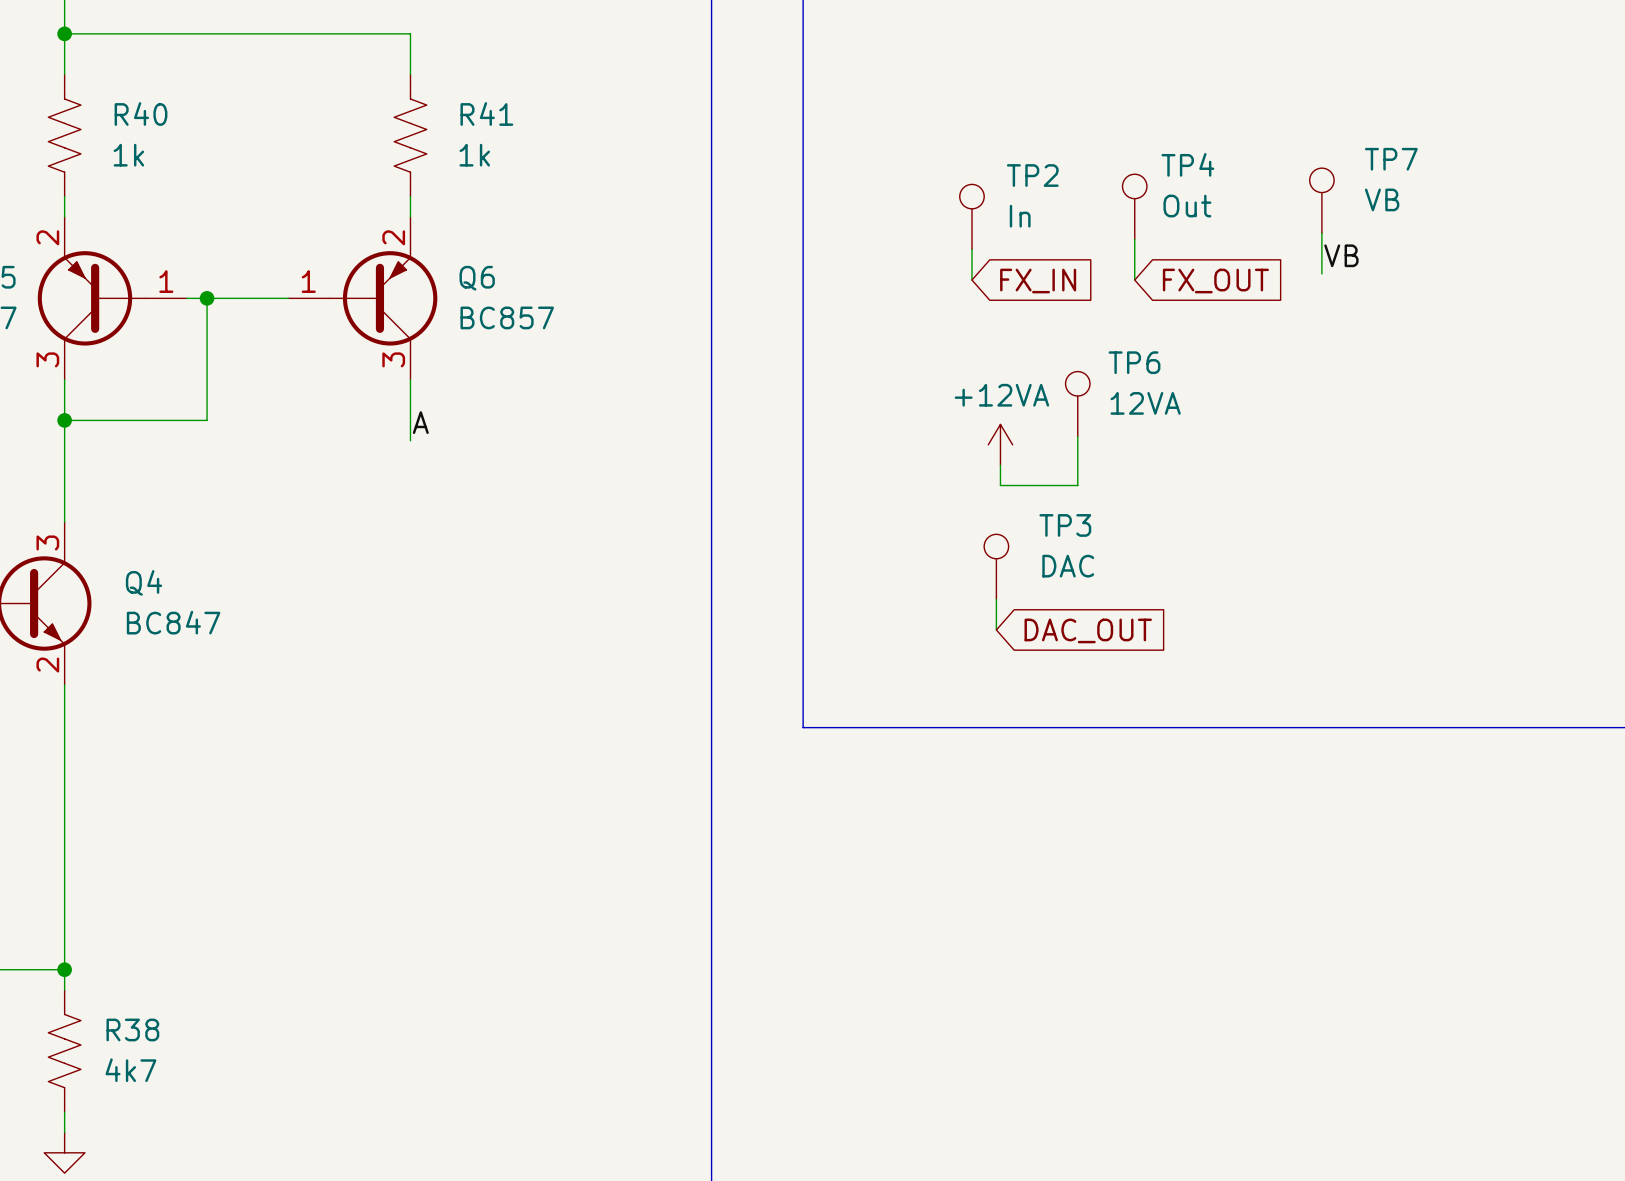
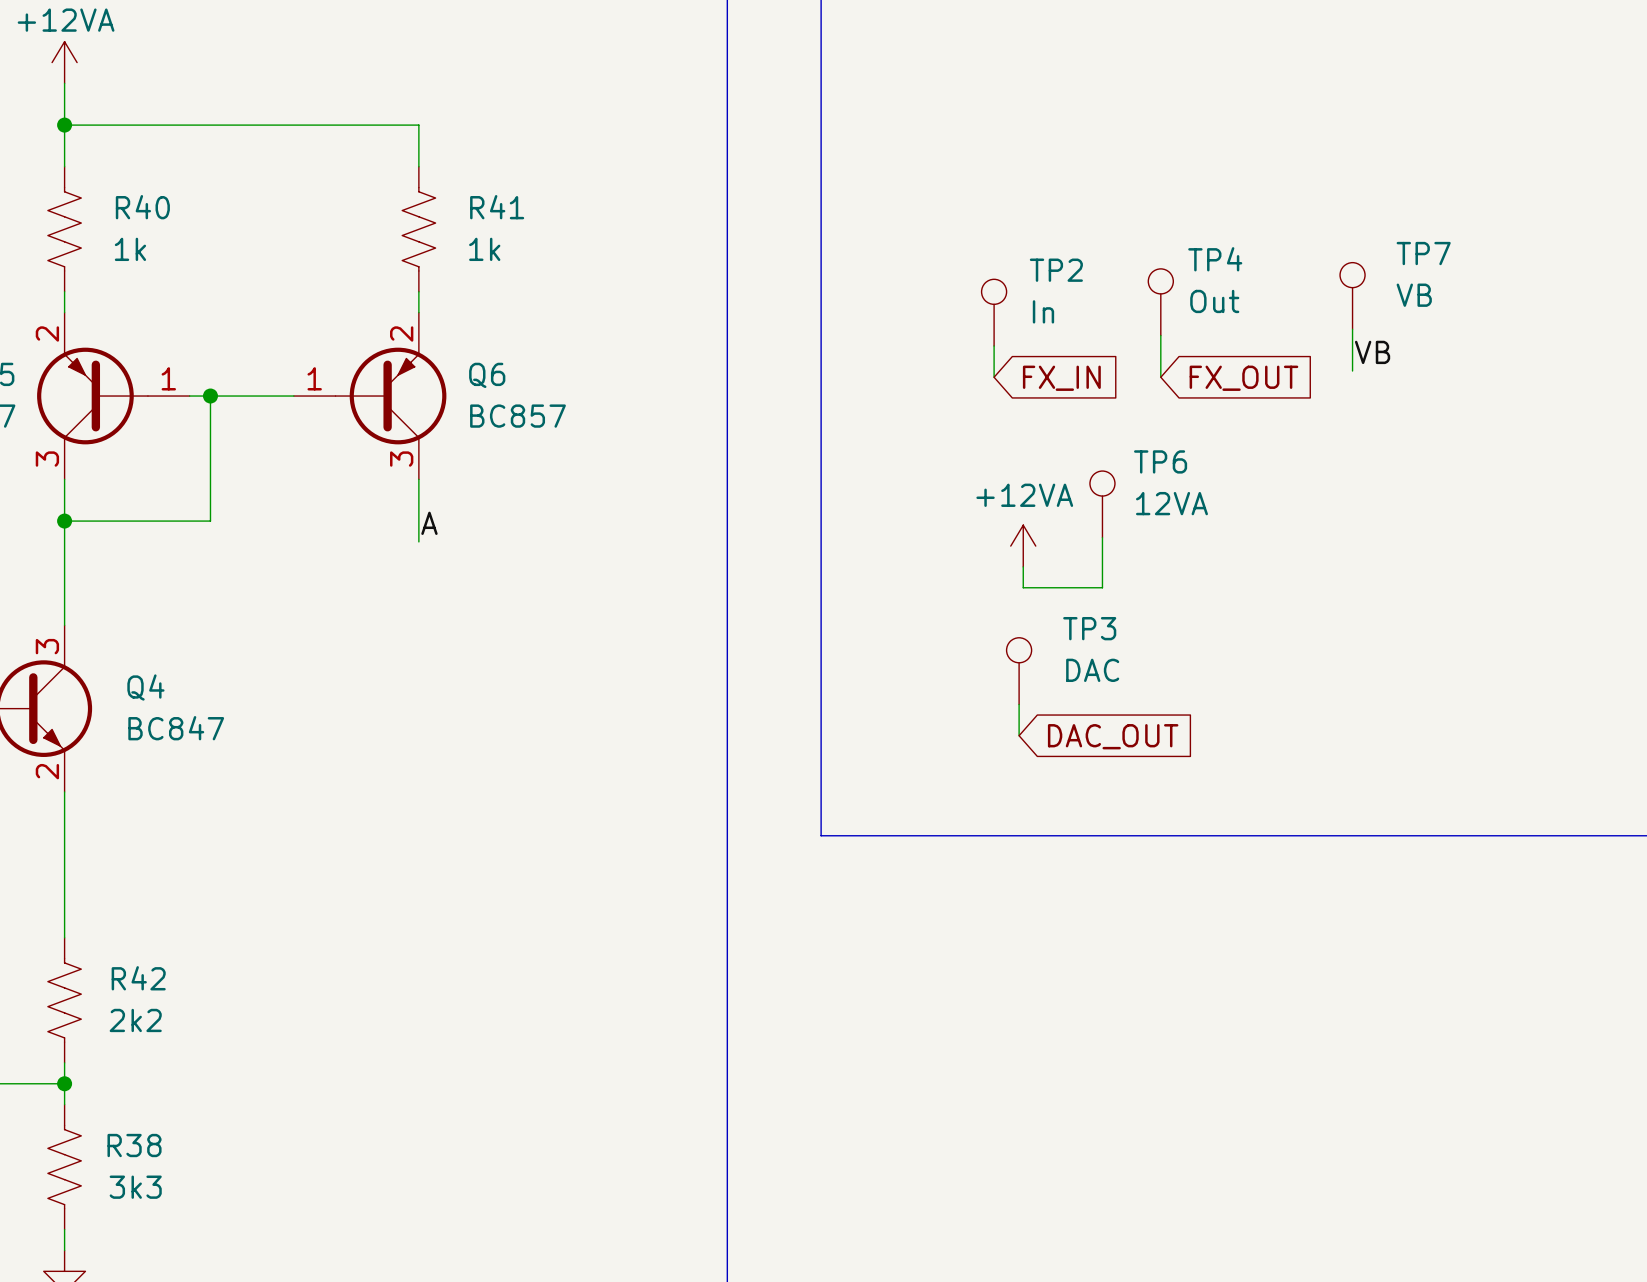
wire: (64, 827) (64, 949) -> none
R42: none -> 2k2 (64, 1000)
R38 value: 4k7 (130, 1070) -> 3k3 (135, 1187)

